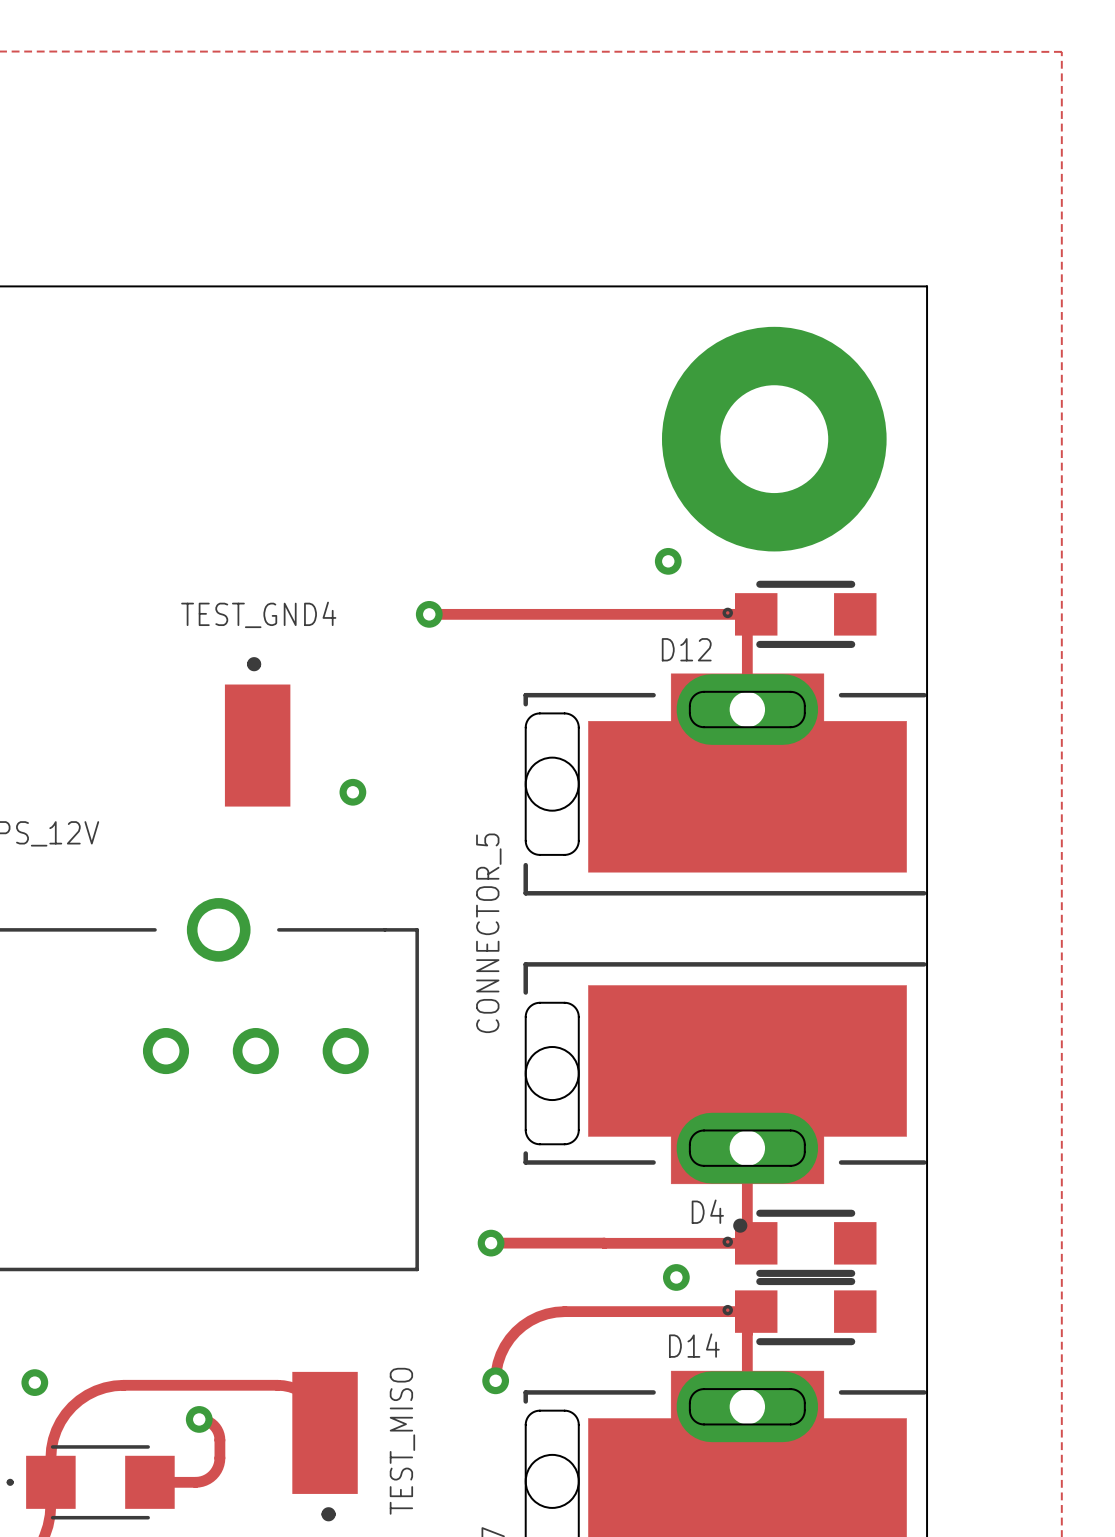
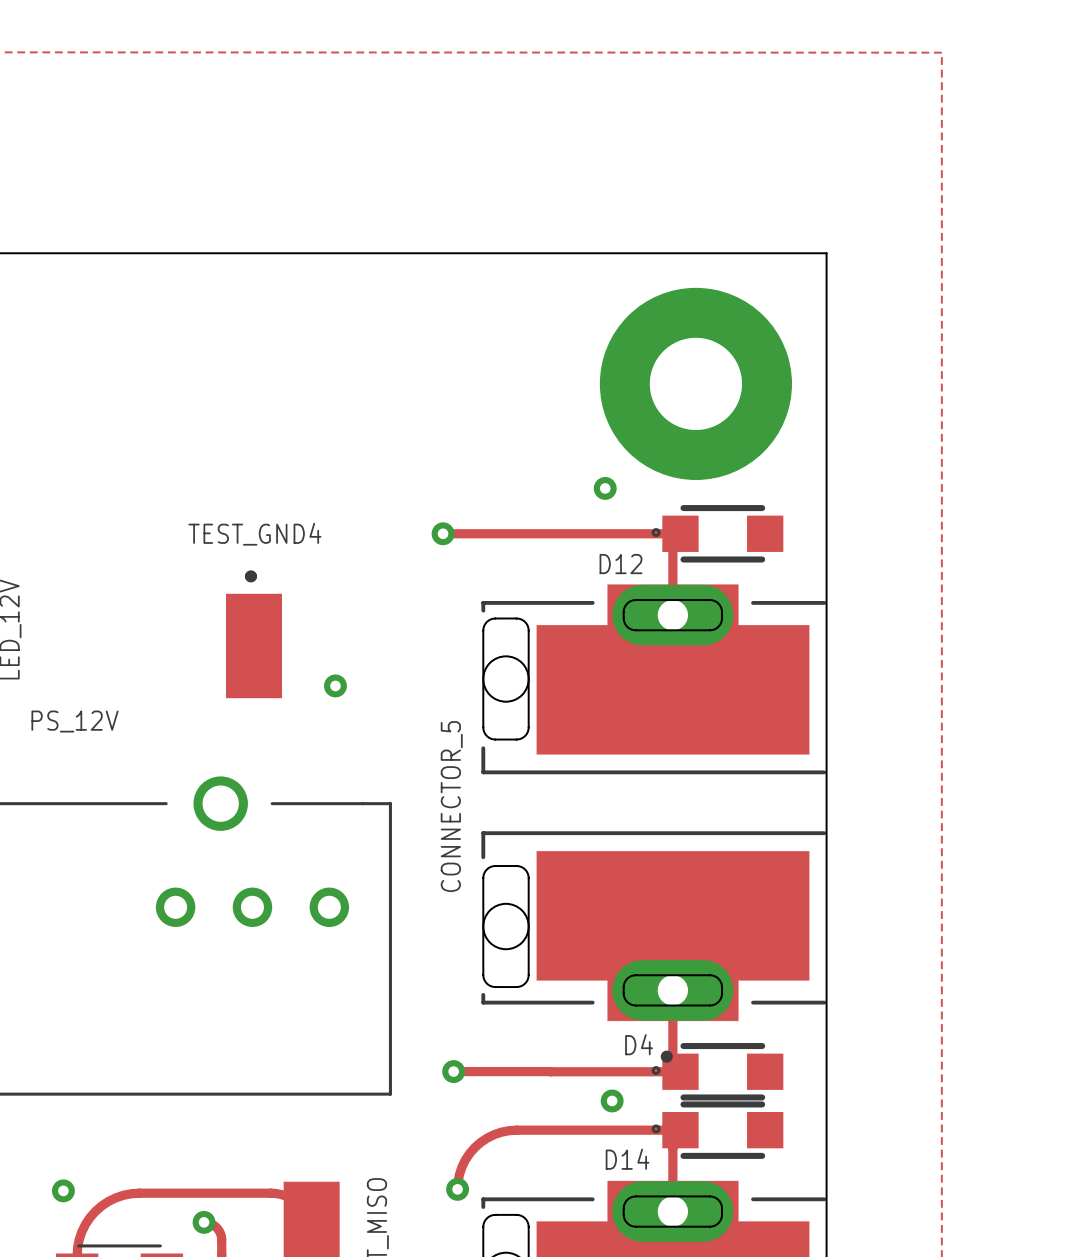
track: (429, 614) (478, 614) -> none
via position: (429, 614) -> (443, 533)

